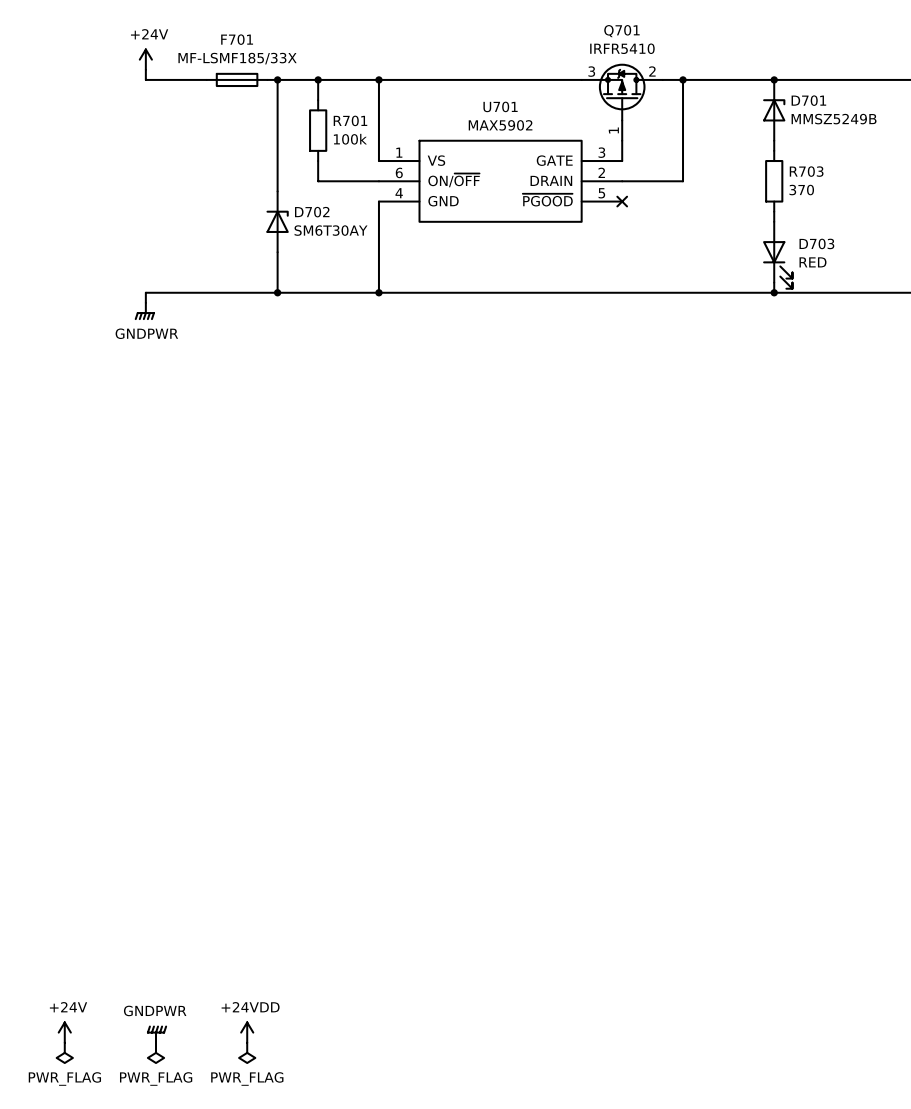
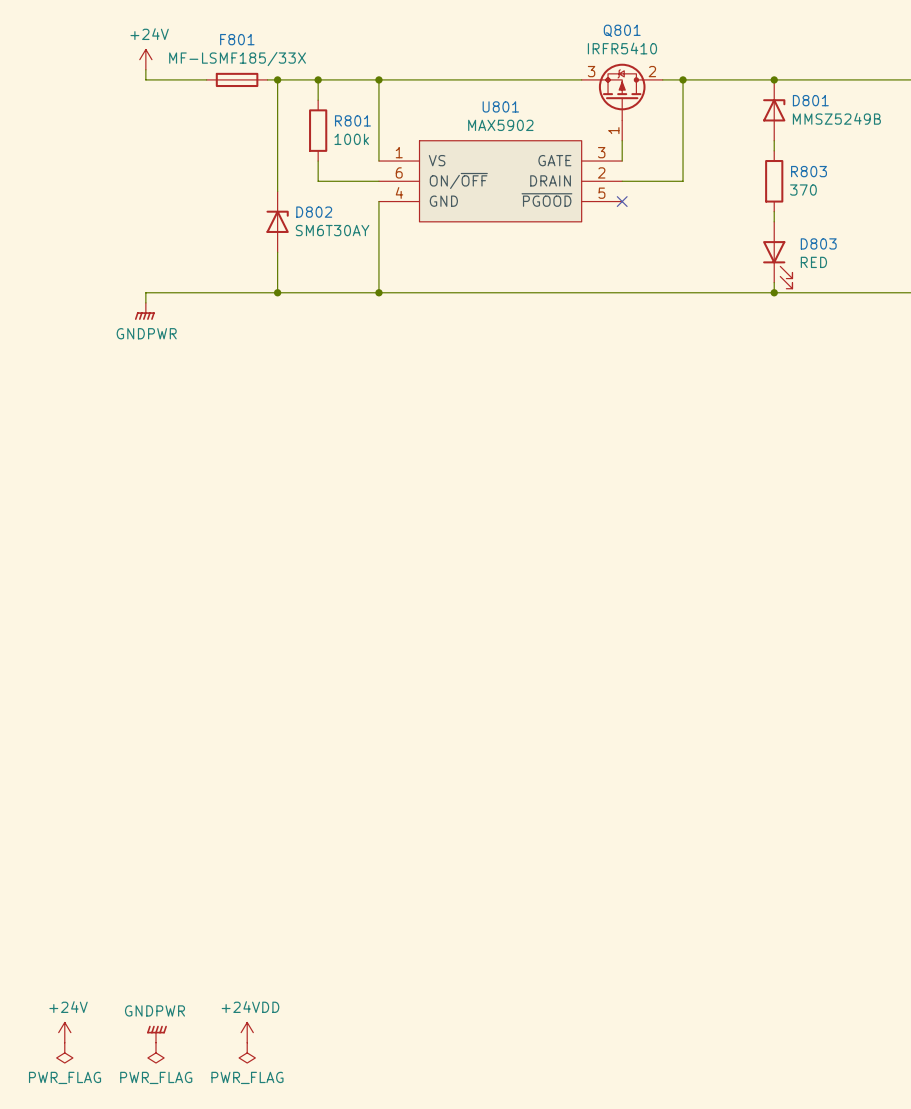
Q701 name: Q701 (621, 31) -> Q801 (622, 30)
F701 name: F701 (237, 39) -> F801 (237, 39)
D701 name: D701 (808, 100) -> D801 (810, 100)
U701 name: U701 (500, 106) -> U801 (500, 106)
R701 name: R701 (350, 120) -> R801 (352, 120)
R703 name: R703 (806, 171) -> R803 (809, 171)
D702 name: D702 (312, 212) -> D802 (314, 212)
D703 name: D703 (816, 243) -> D803 (818, 243)

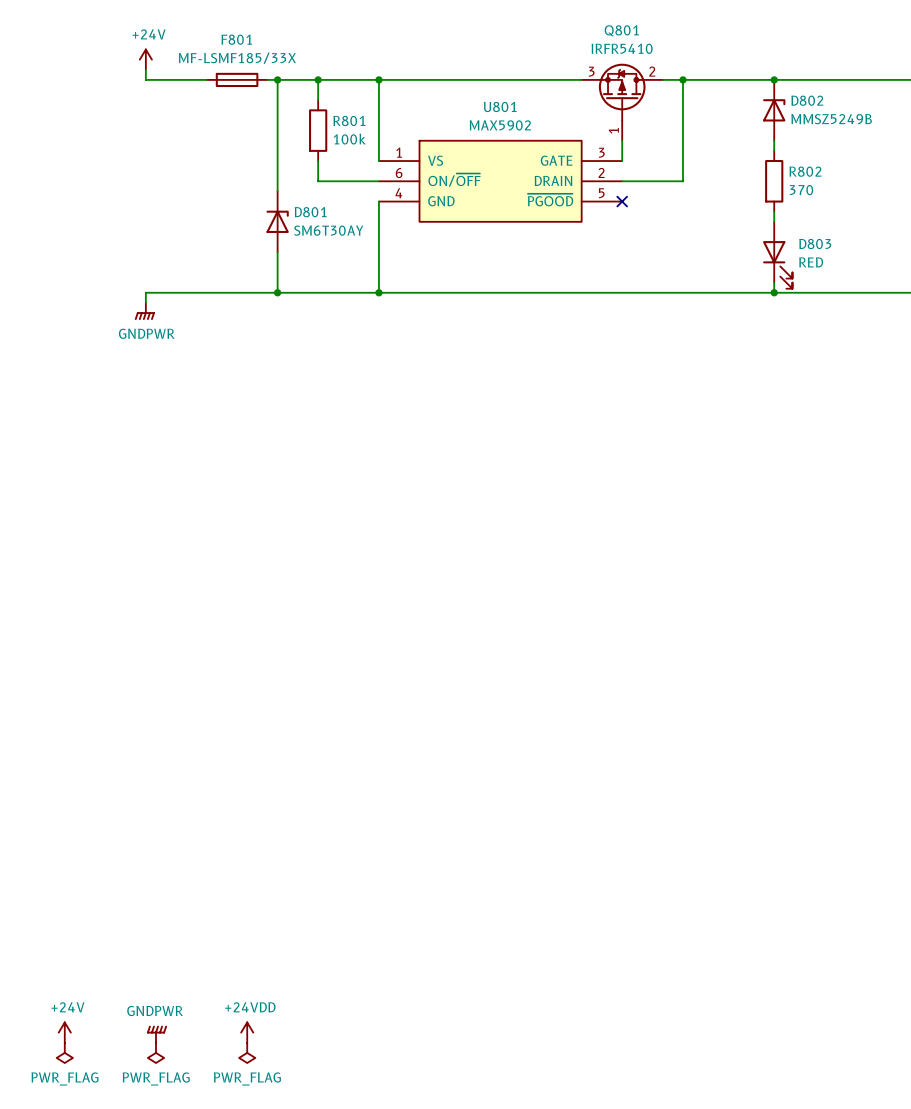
D801 name: D801 (810, 100) -> D802 (807, 100)
R803 name: R803 (809, 171) -> R802 (805, 171)
D802 name: D802 (314, 212) -> D801 (310, 212)

